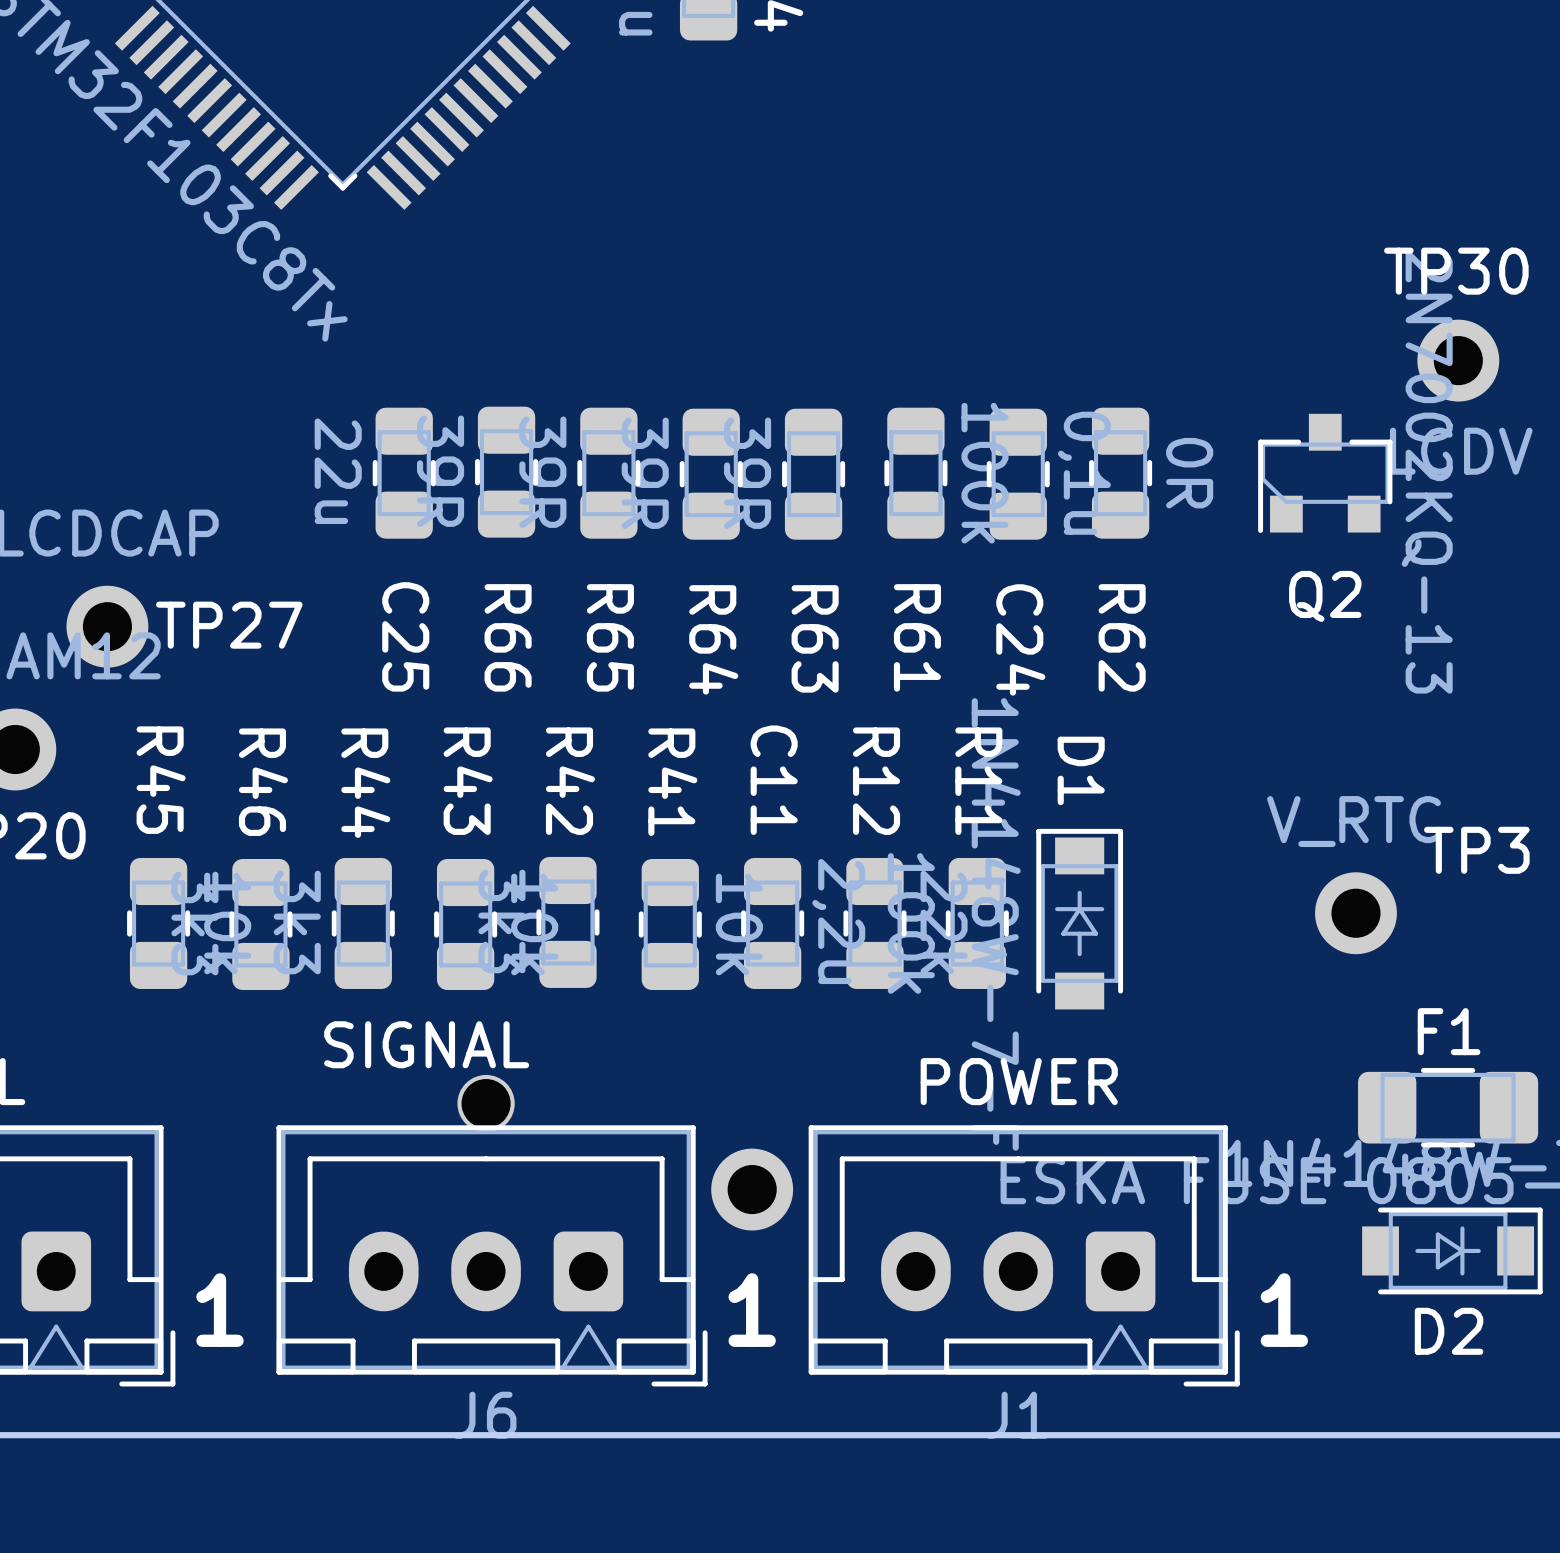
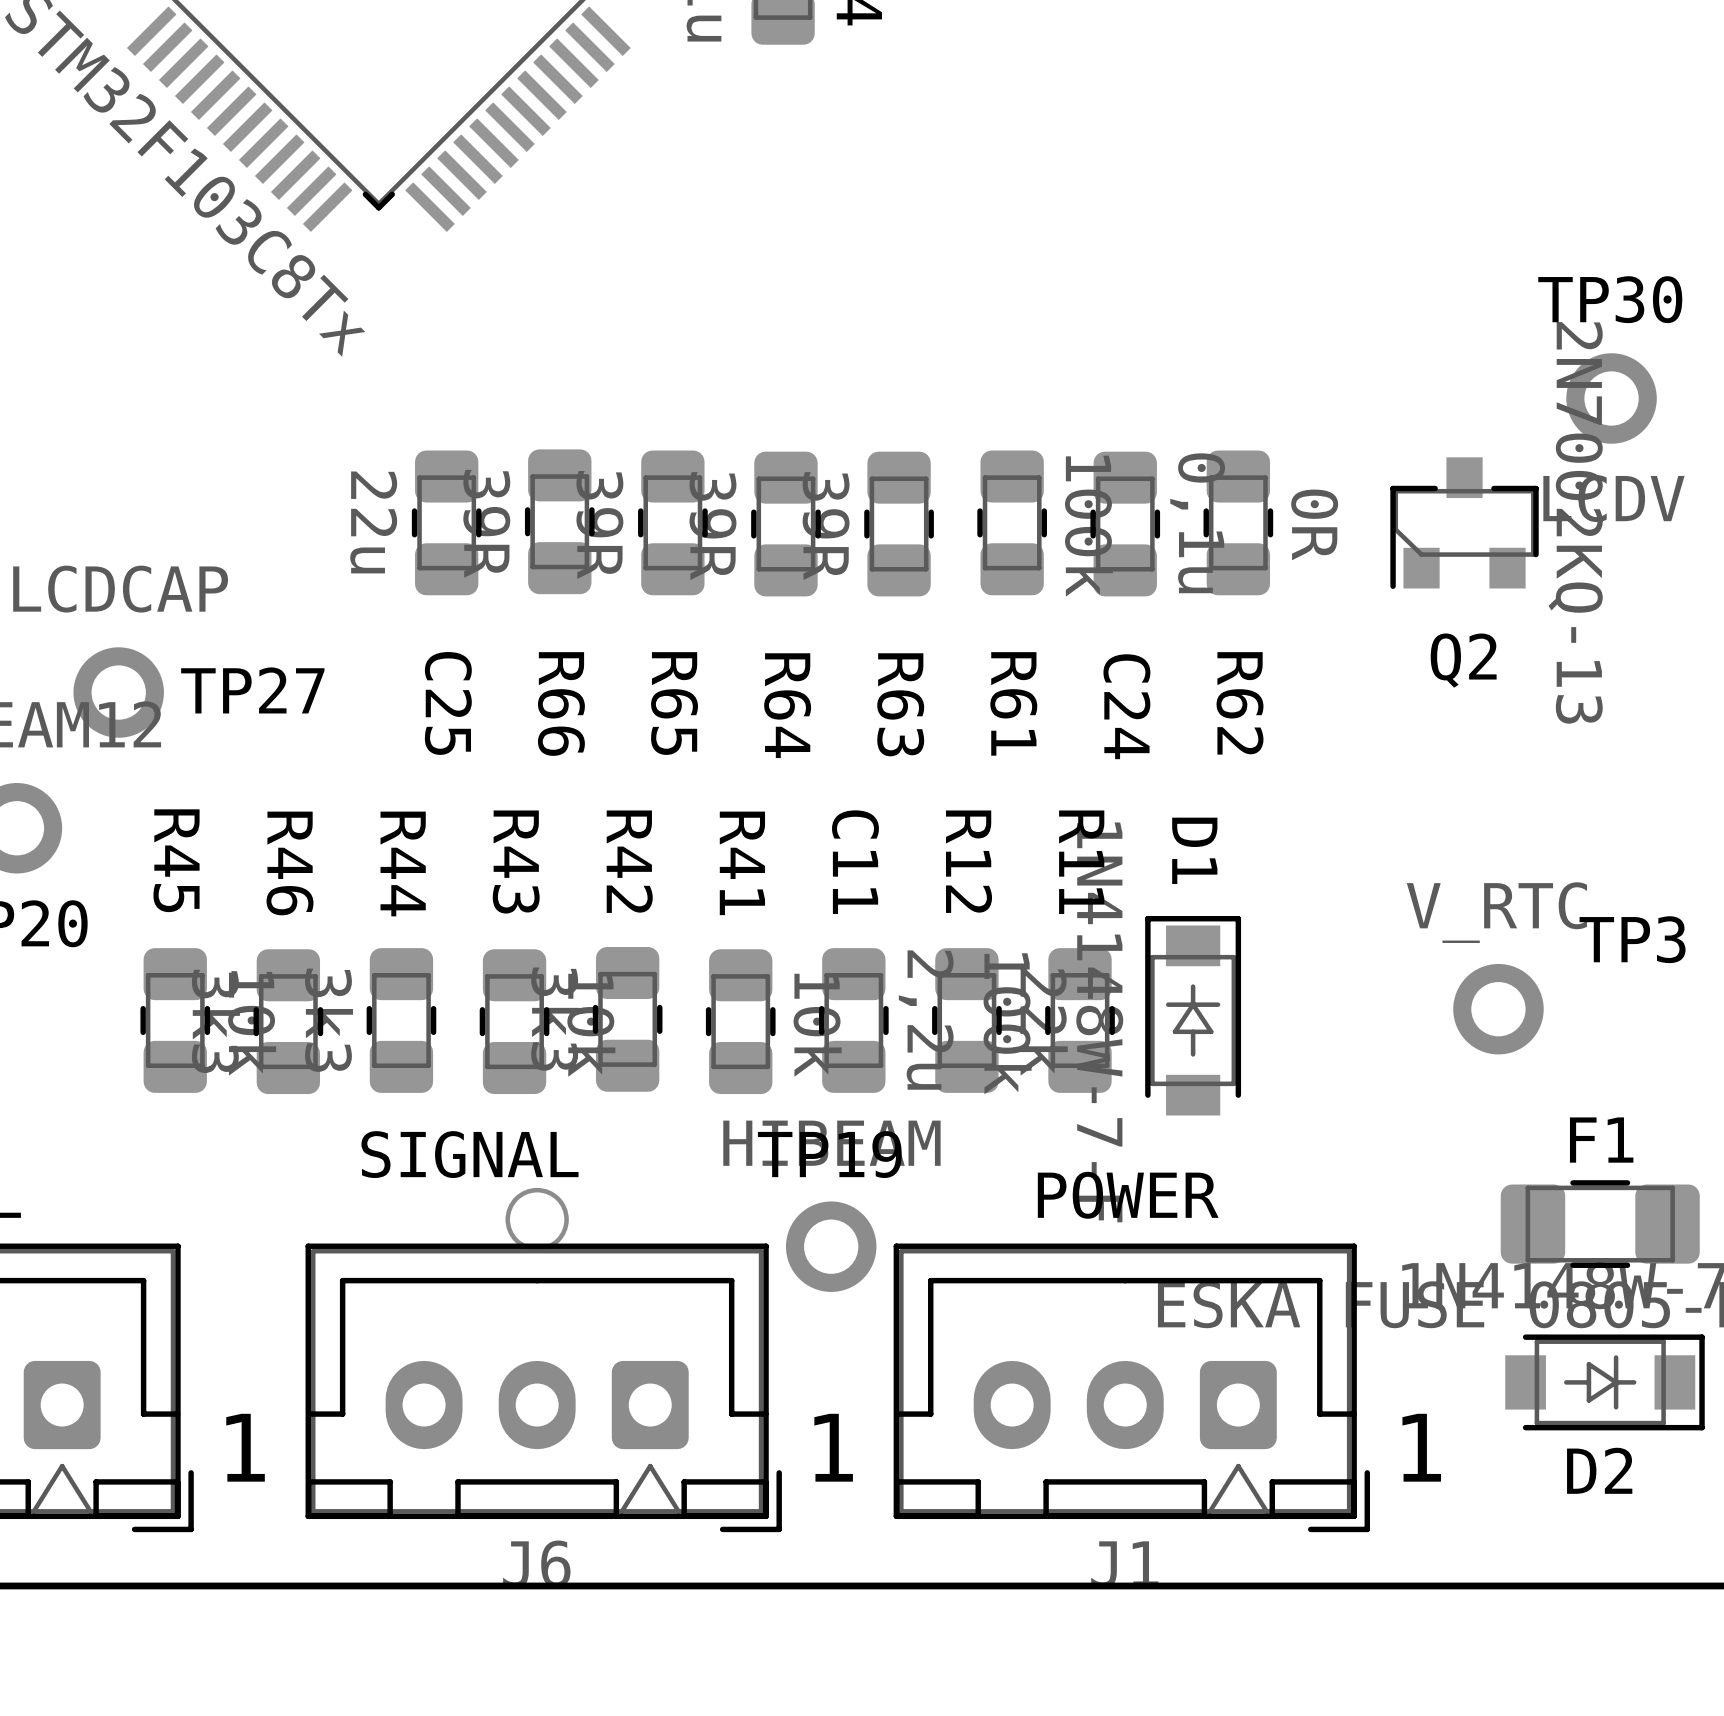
TP19 position: (752, 1189) -> (831, 1246)

